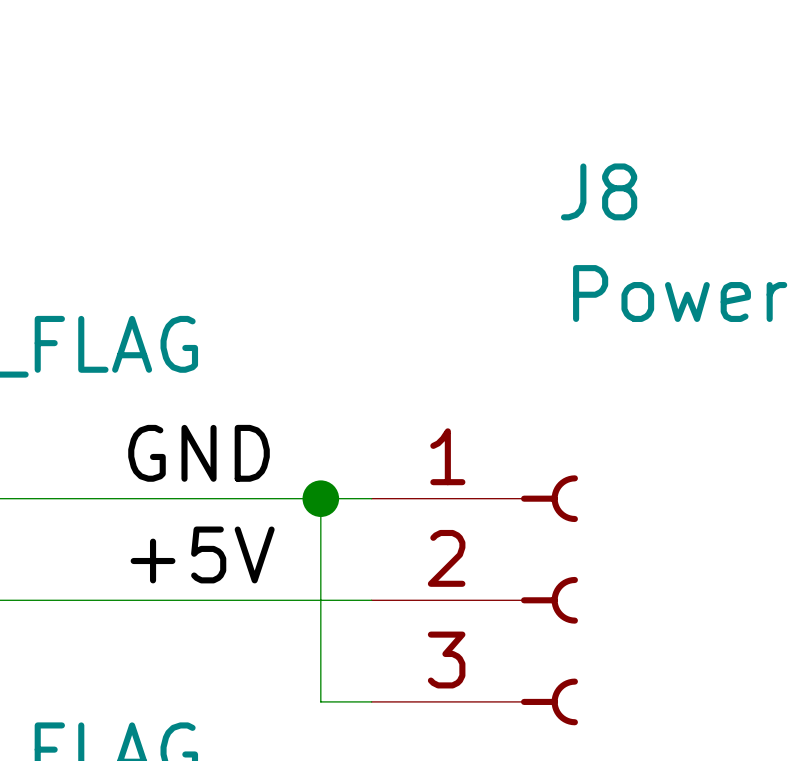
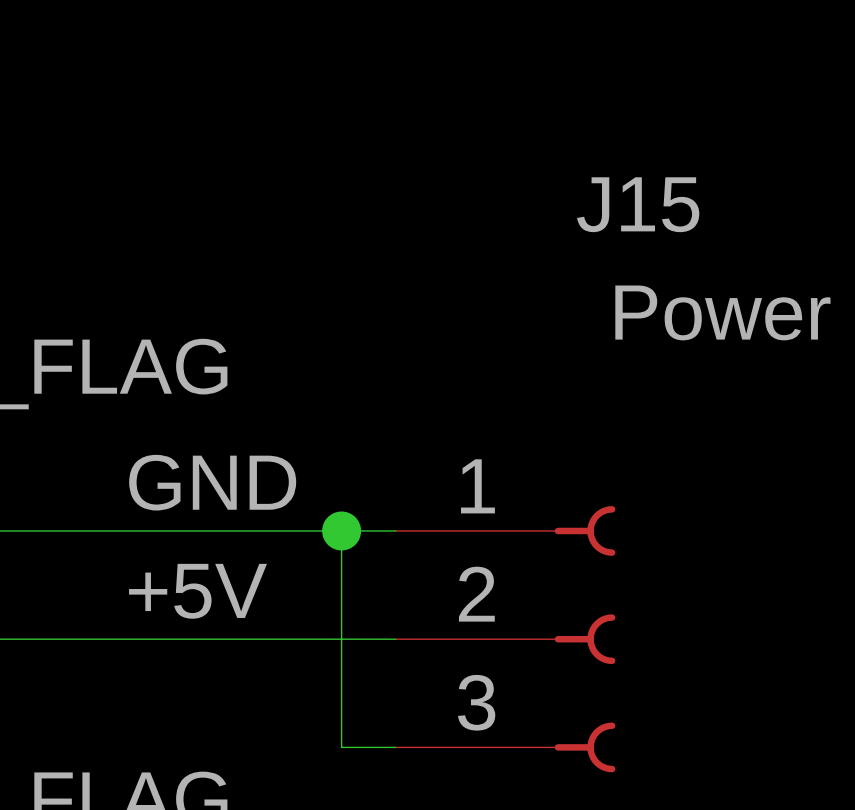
J8 name: J8 (599, 191) -> J15 (638, 204)

